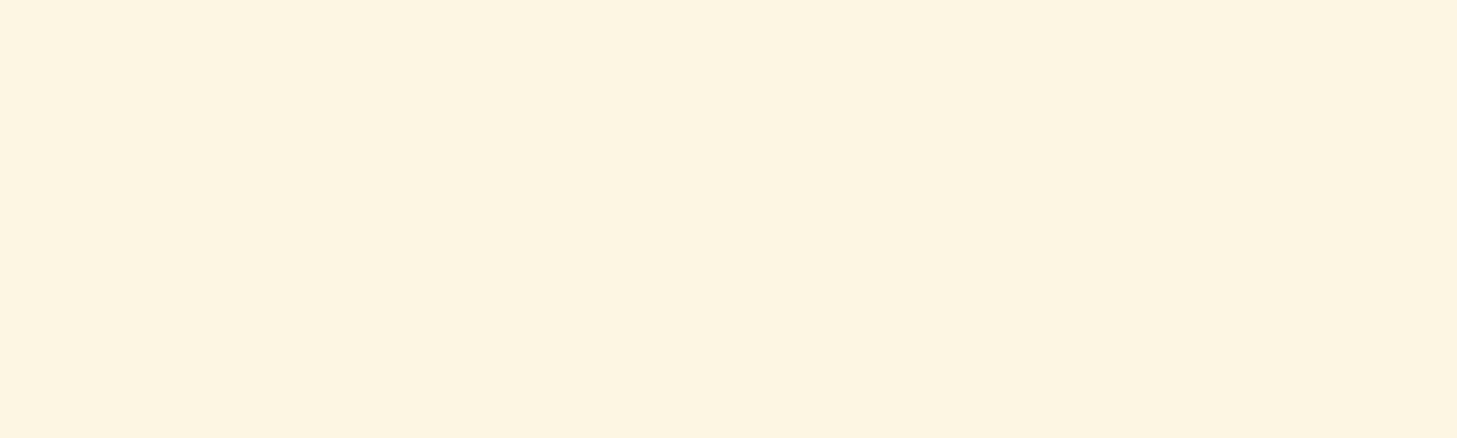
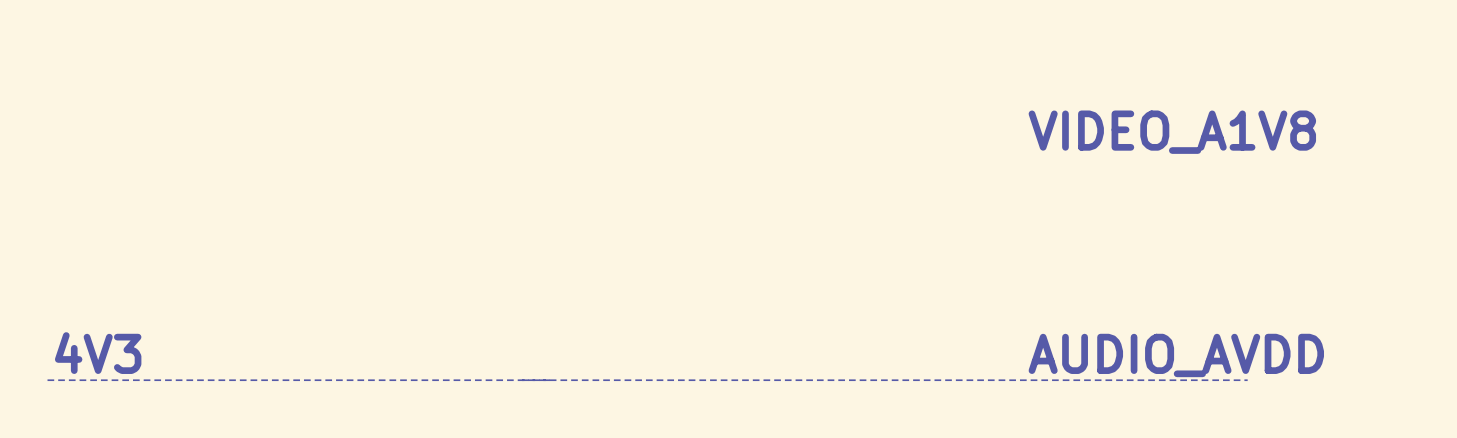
text: none -> VIDEO_A1V8 (1172, 132)
text: none -> 4V3 (98, 353)
text: none -> AUDIO_AVDD (1176, 355)
line: none -> (47, 380) (1247, 380)

